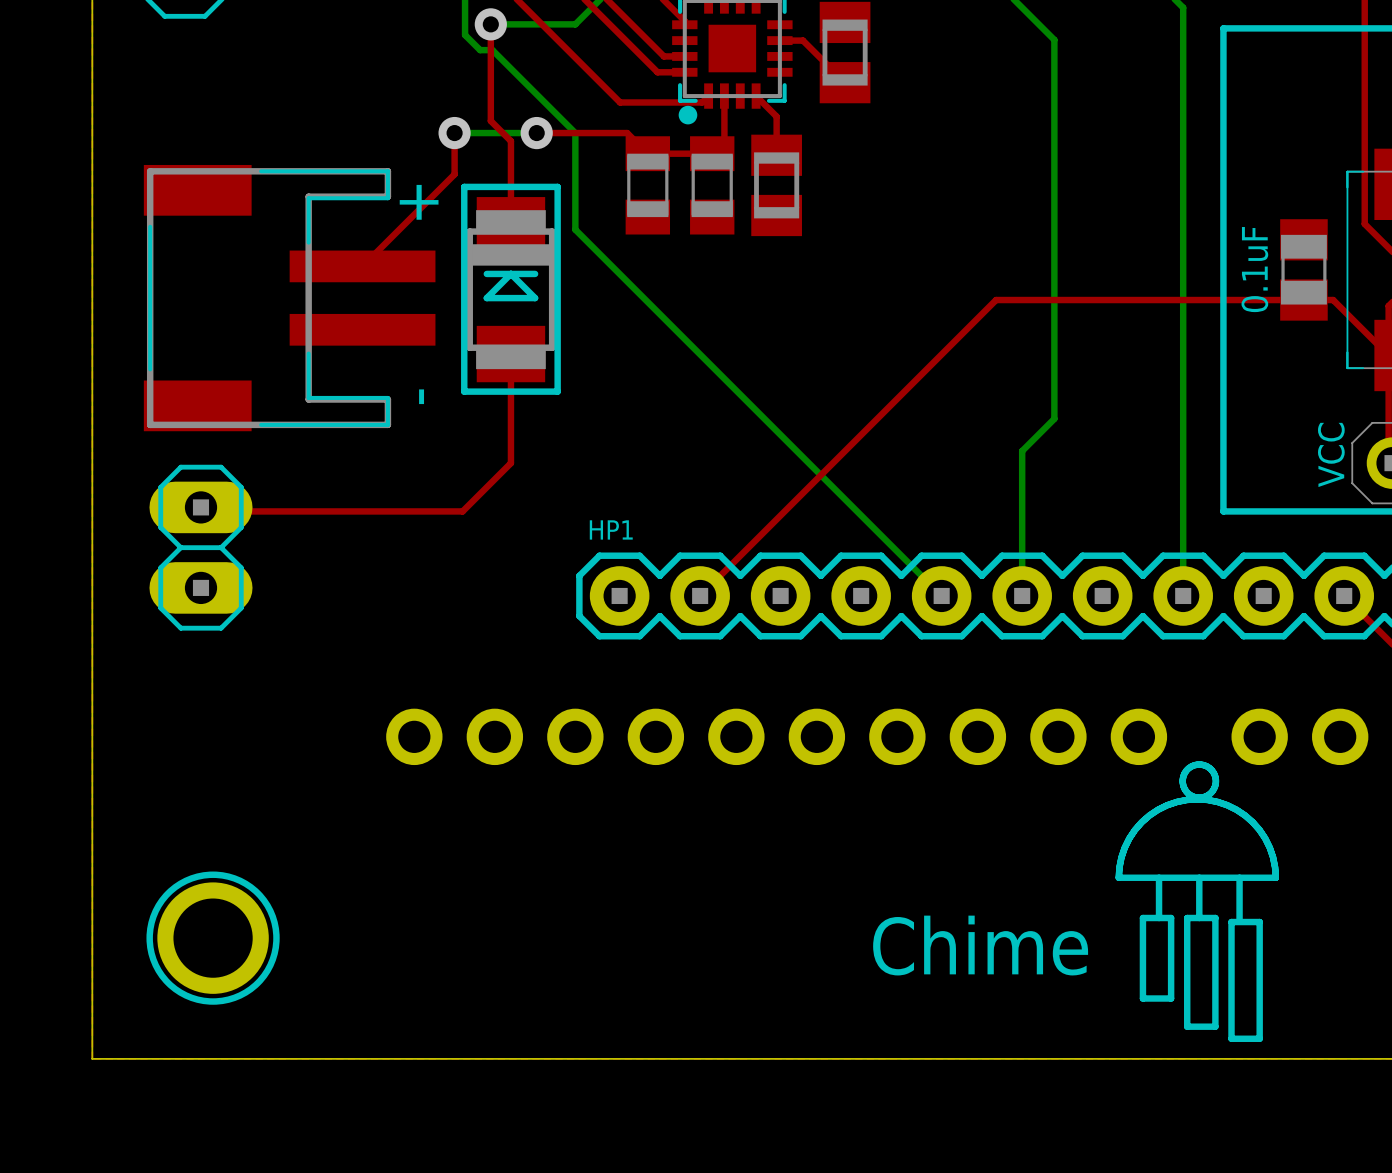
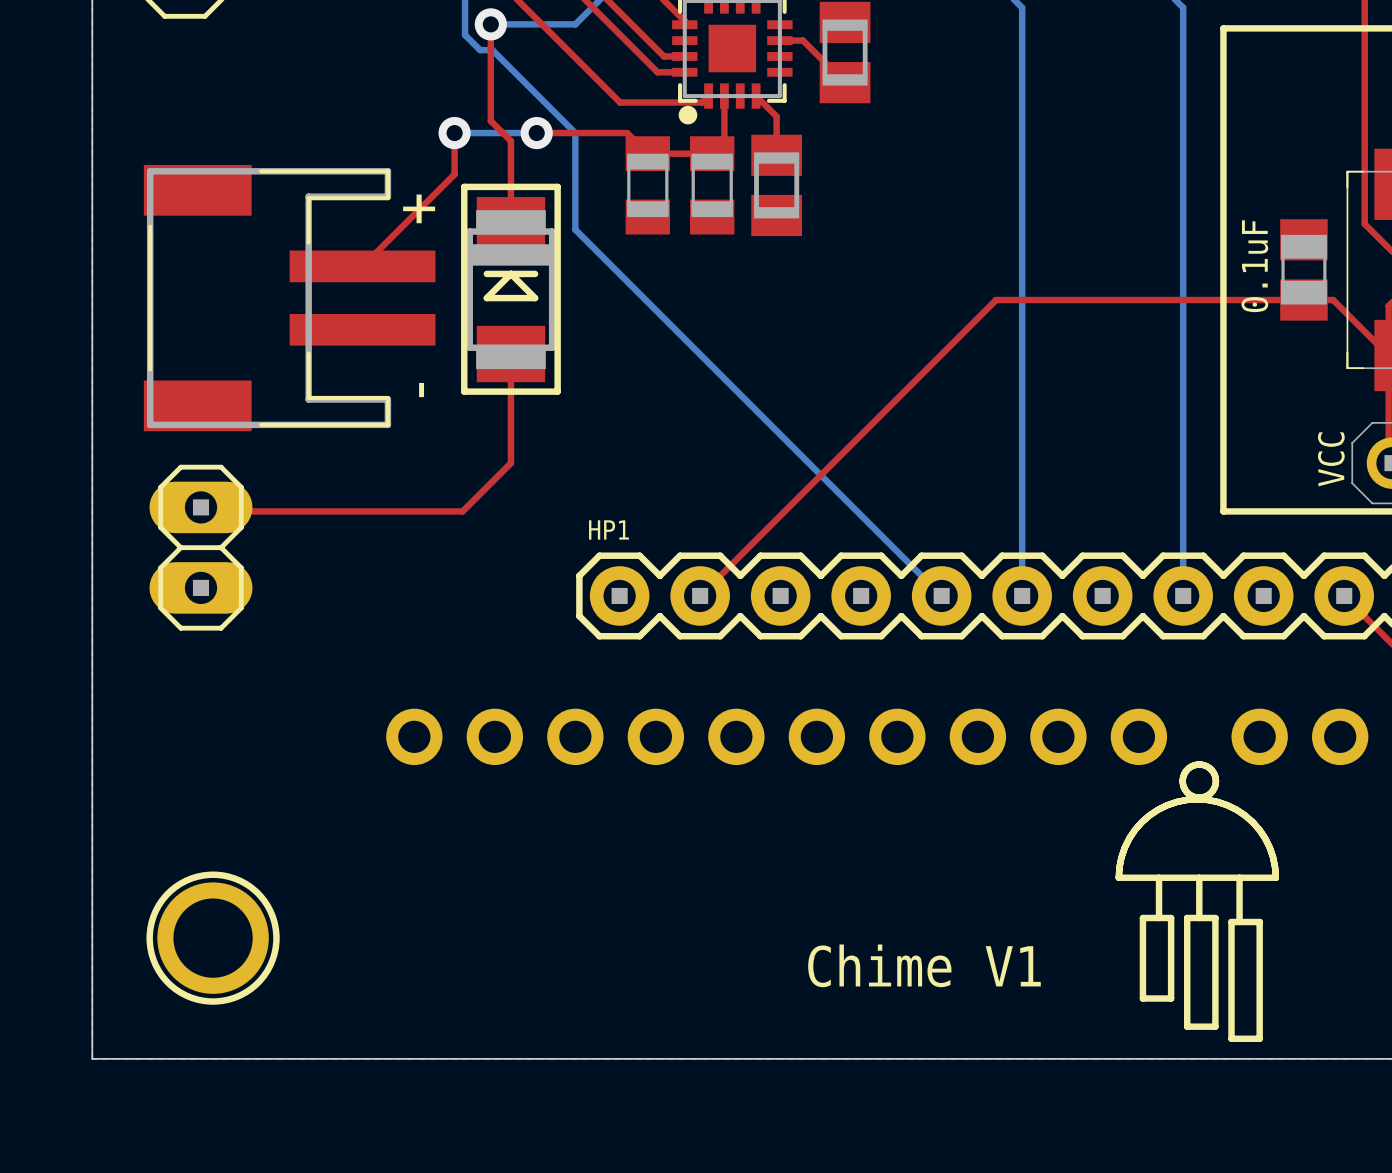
bottom track: (1022, 7) (1054, 39) (1054, 418) (1022, 451) -> (1022, 7) (1022, 451)
text: Chime (980, 945) -> Chime V1 (924, 965)

